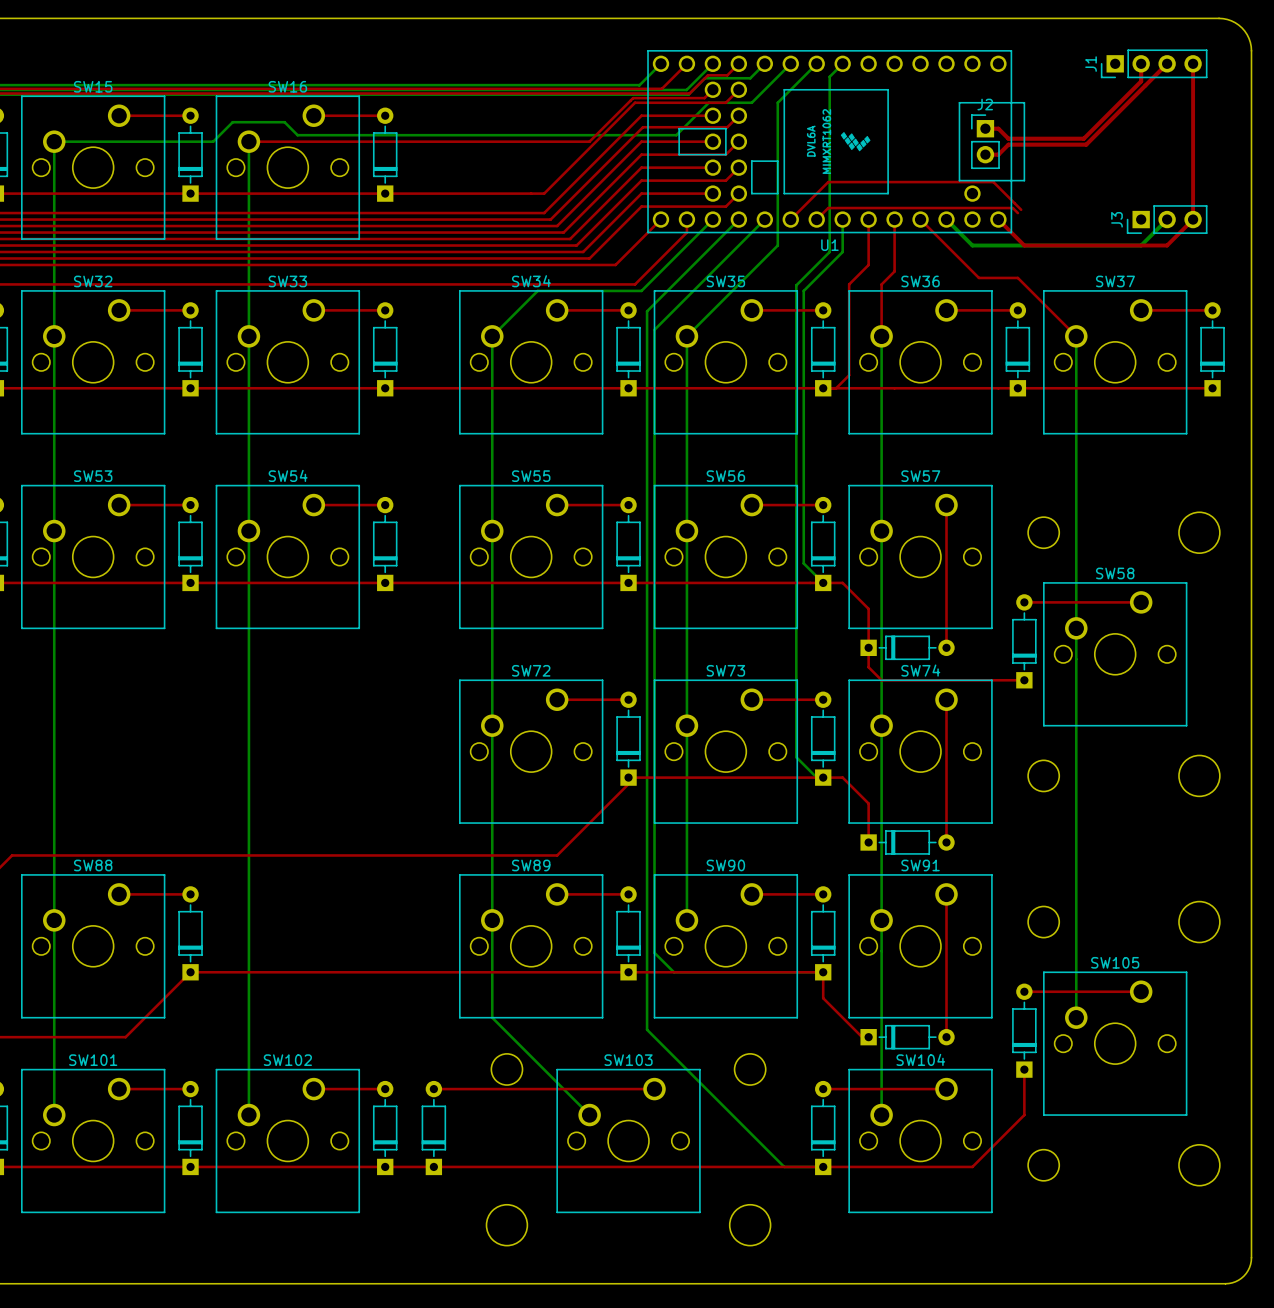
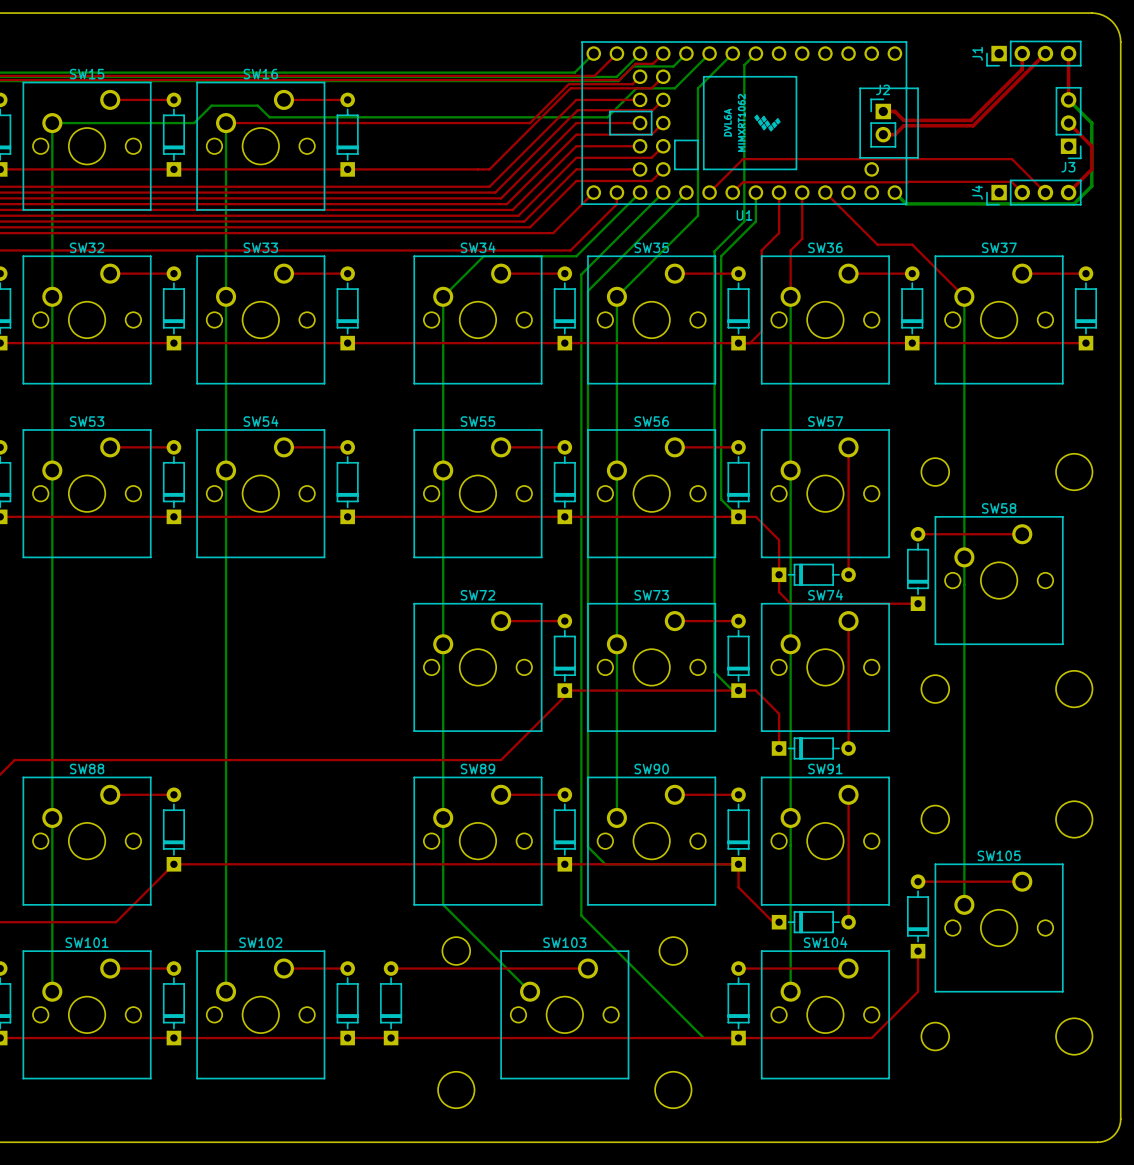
top track: (1193, 115) (1193, 219) (1167, 245) (1024, 245) (998, 219) -> none
bottom track: none -> (1068, 99) (1091, 123) (1091, 186) (1074, 203) (906, 203) (894, 192)
top track: none -> (1068, 123) (1091, 146) (1091, 169) (1068, 192)
top track: (993, 182) (1021, 209) -> (890, 159) (1012, 159) (1045, 192)
top track: (1012, 208) (1017, 213) -> (907, 182) (1011, 181) (1022, 192)
bottom track: (946, 219) (972, 245) (1141, 245) (1167, 219) -> none
J4: none -> (1033, 192)
J3 rotation: 0° (1167, 219) -> 90° counterclockwise (1068, 123)
J3 position: (1167, 219) -> (1068, 123)

